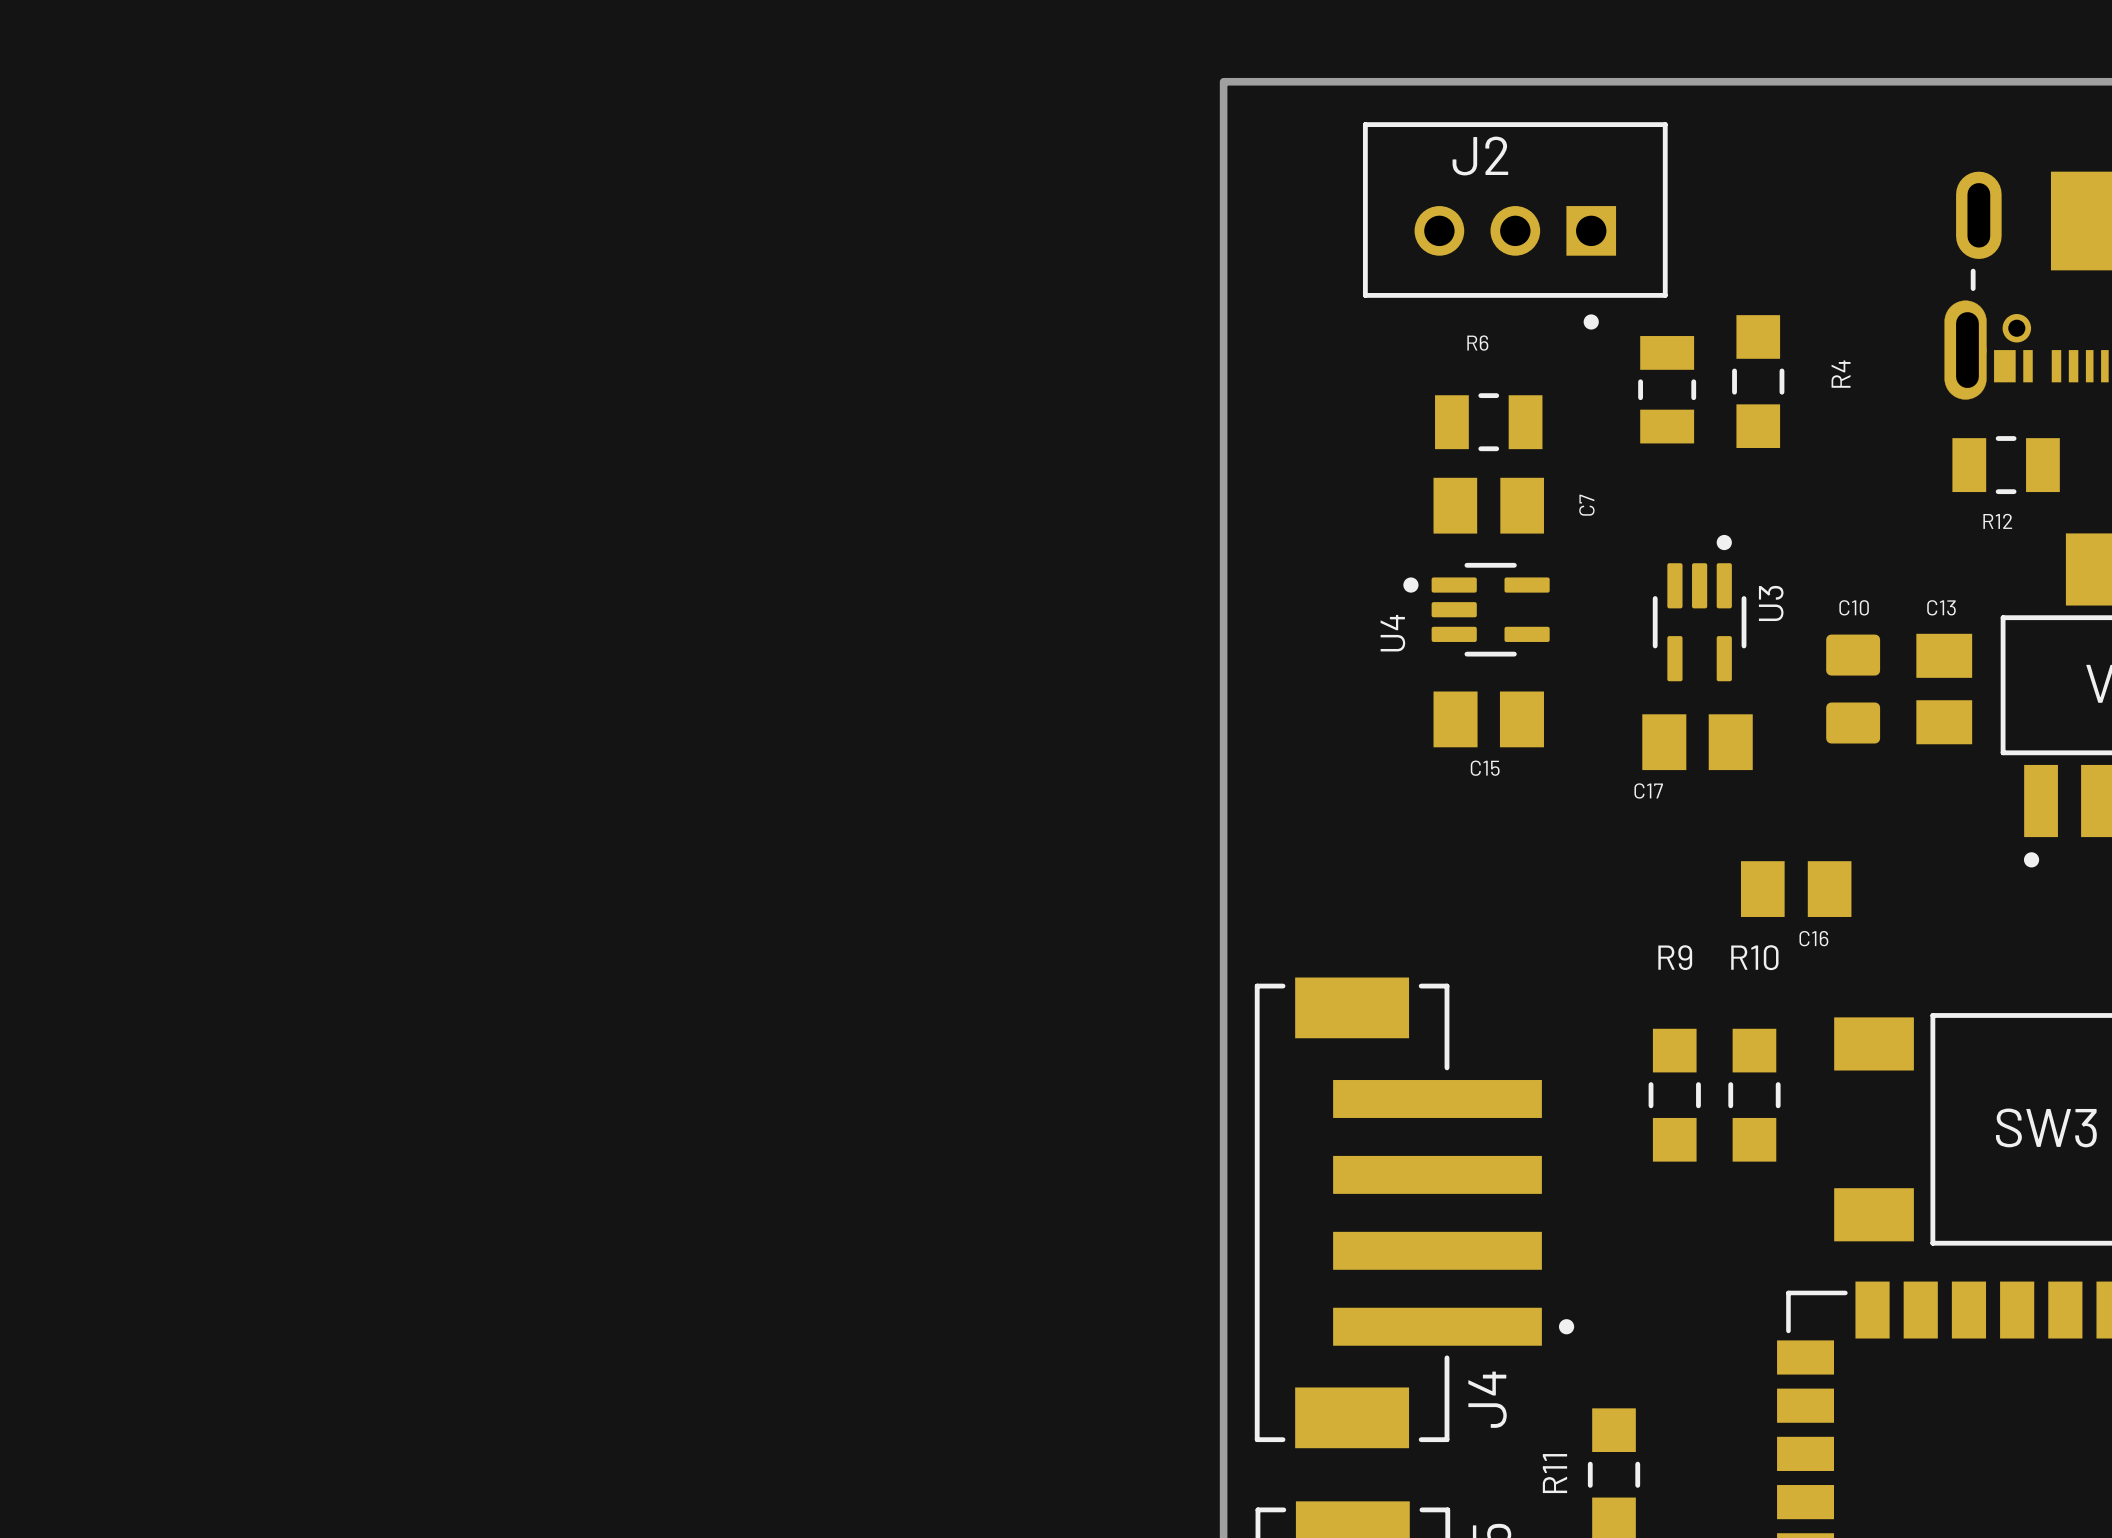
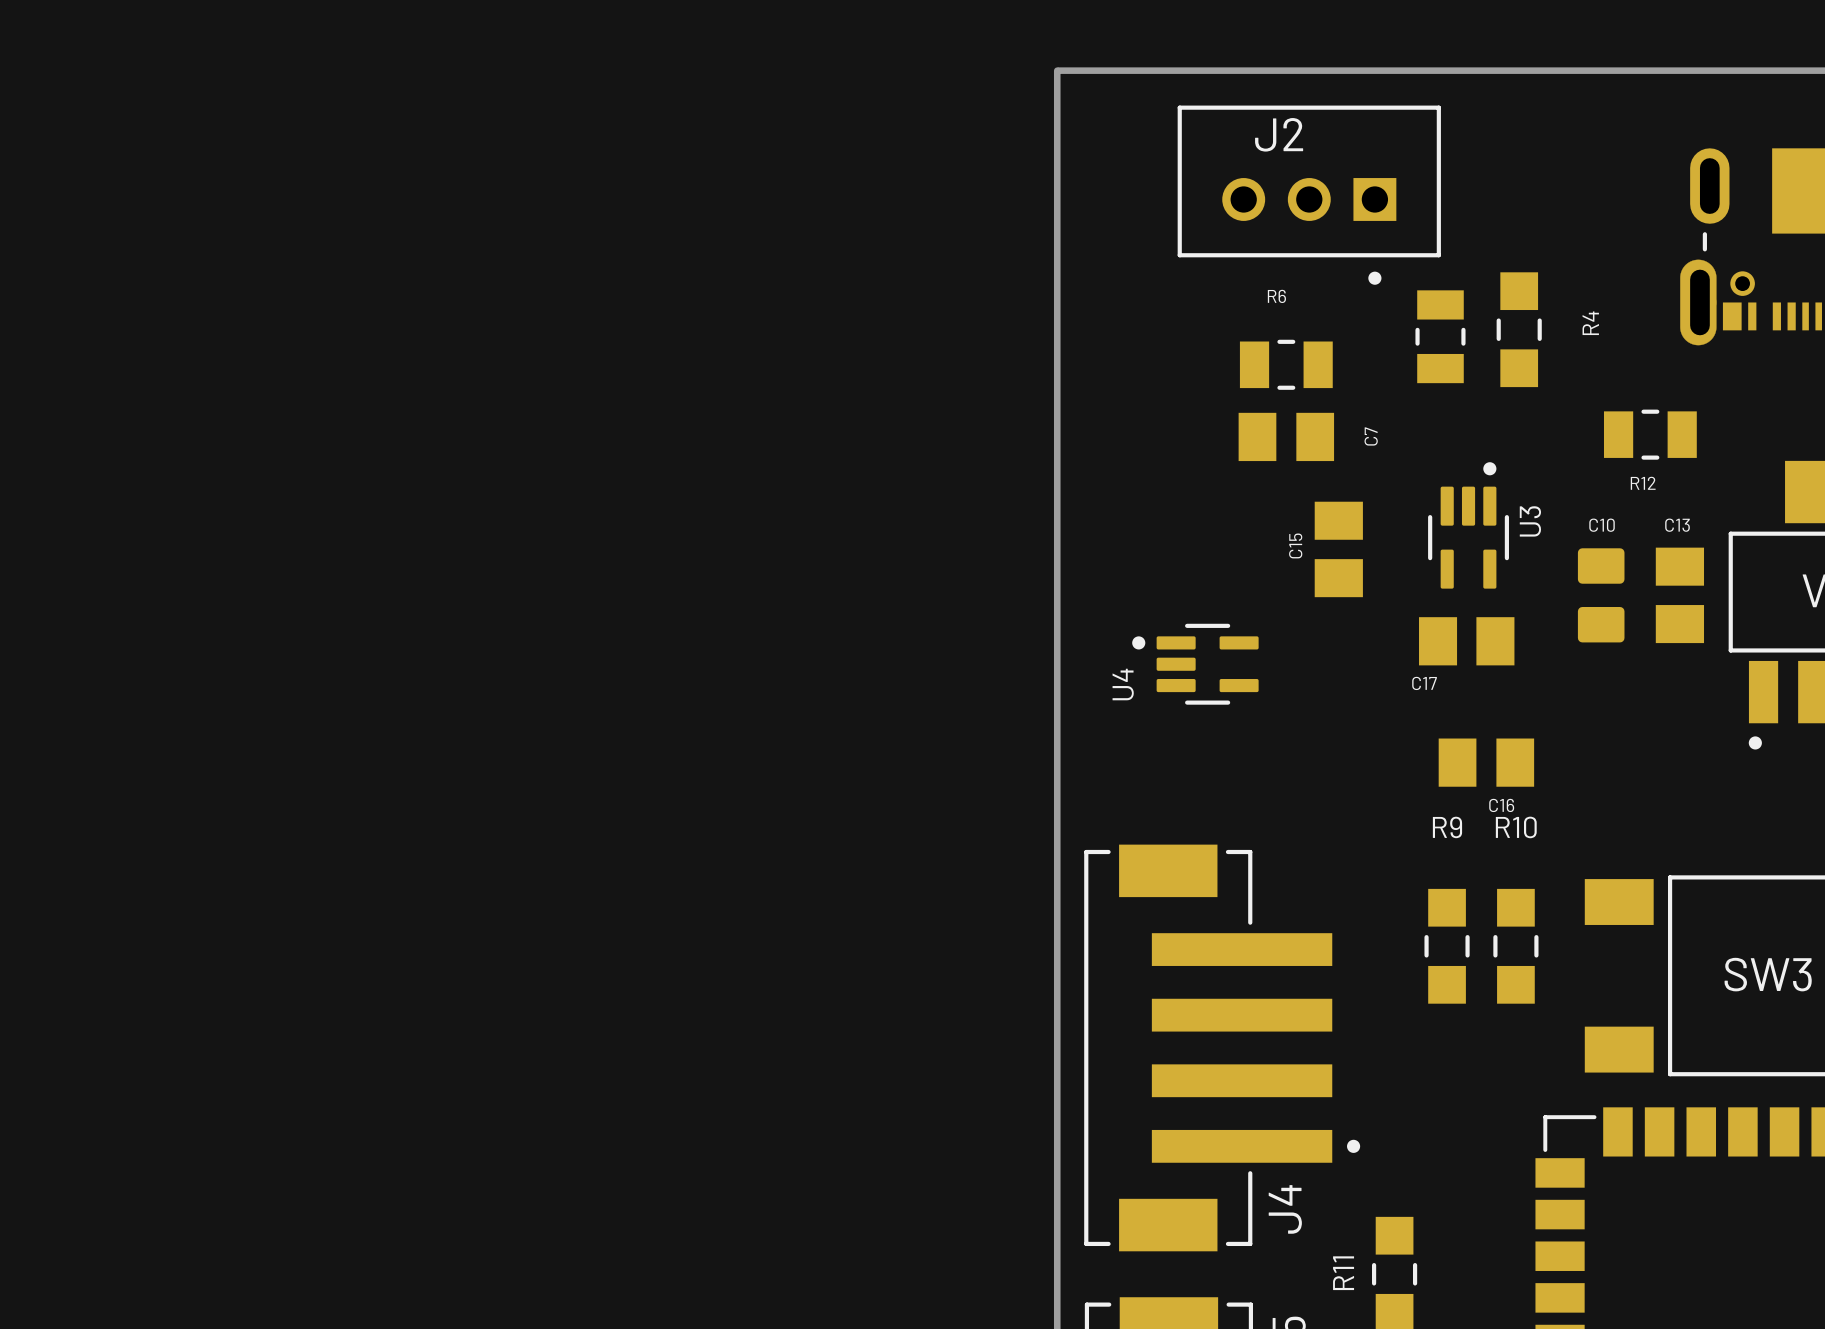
R12 position: (2006, 465) -> (1650, 434)
U4 position: (1476, 609) -> (1195, 664)
C15 rotation: 0° (1488, 719) -> 90° clockwise (1338, 549)
C15 position: (1488, 719) -> (1338, 549)
C16 position: (1796, 889) -> (1486, 762)

